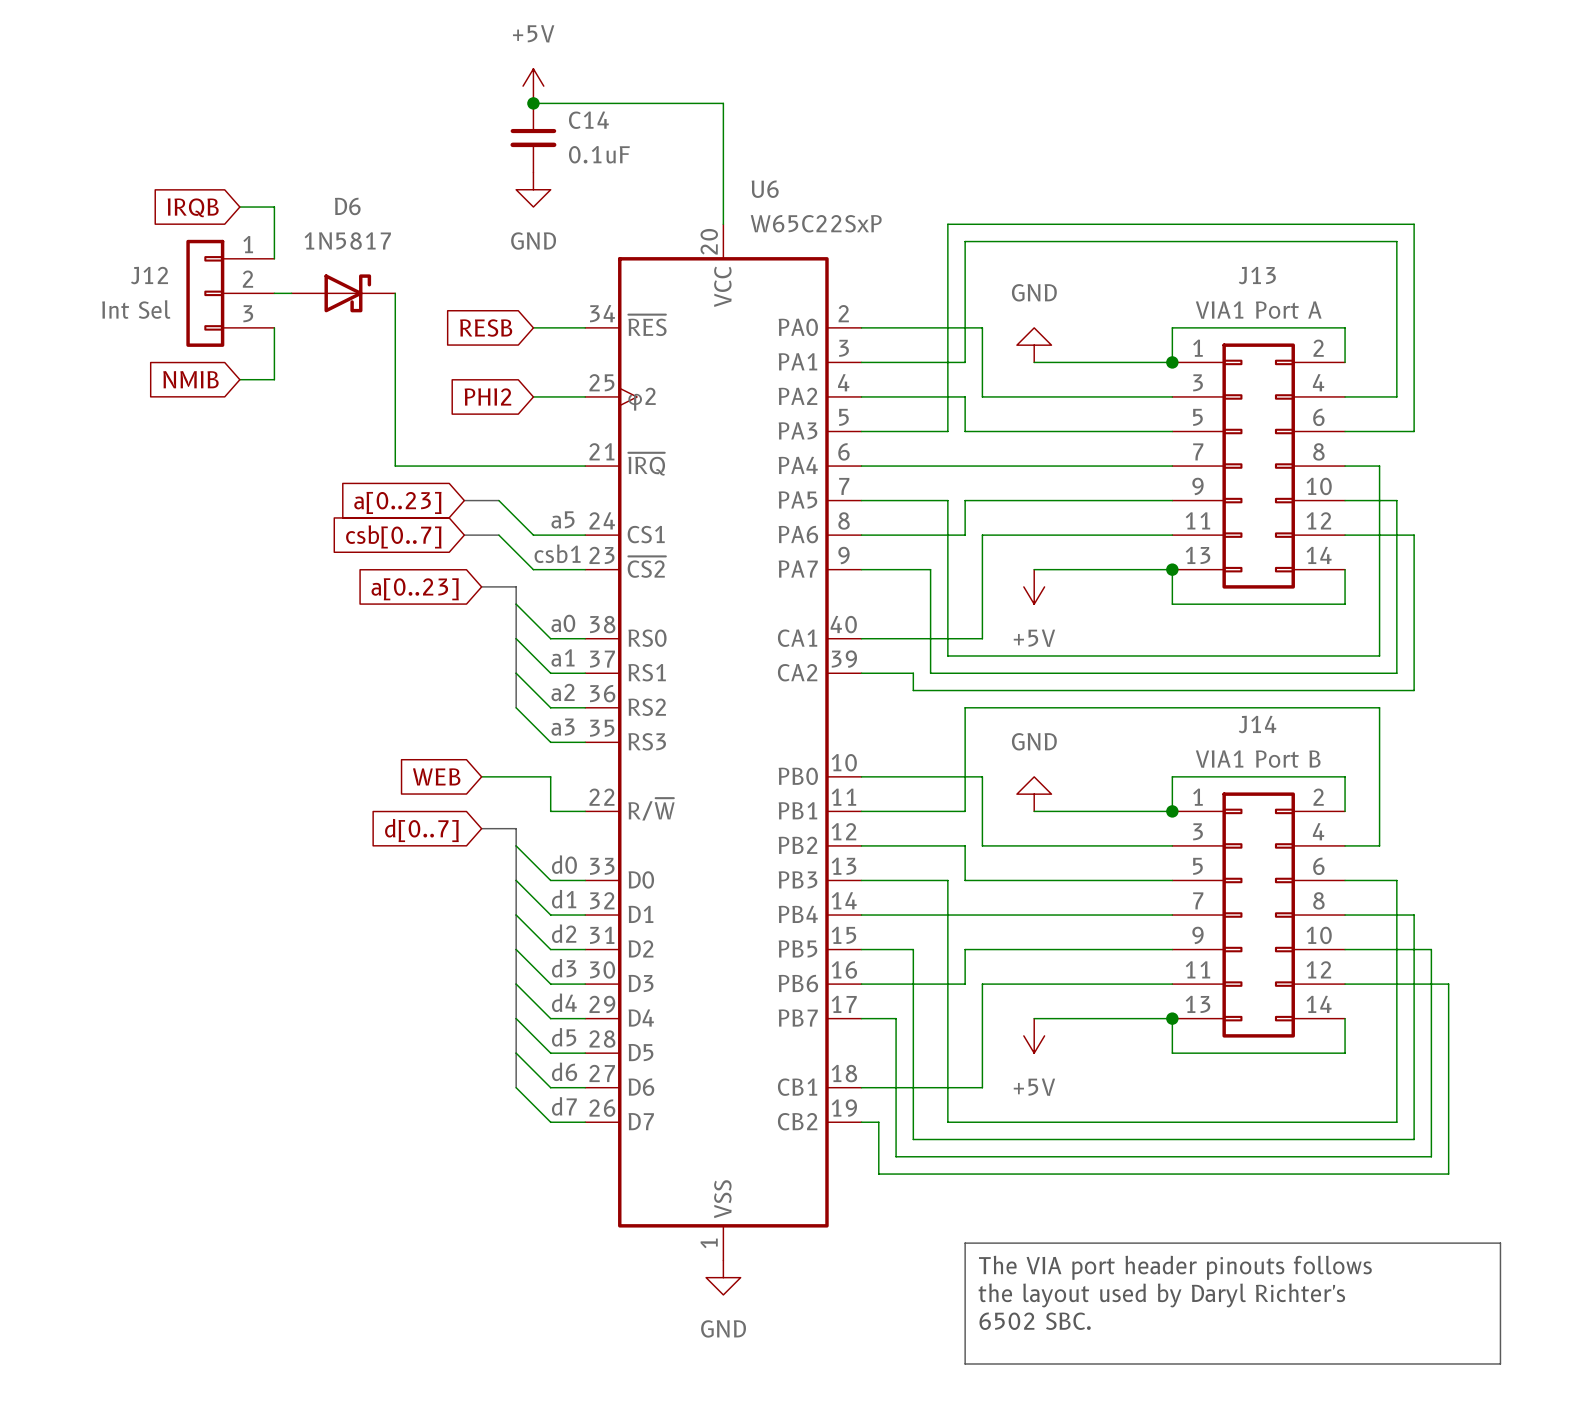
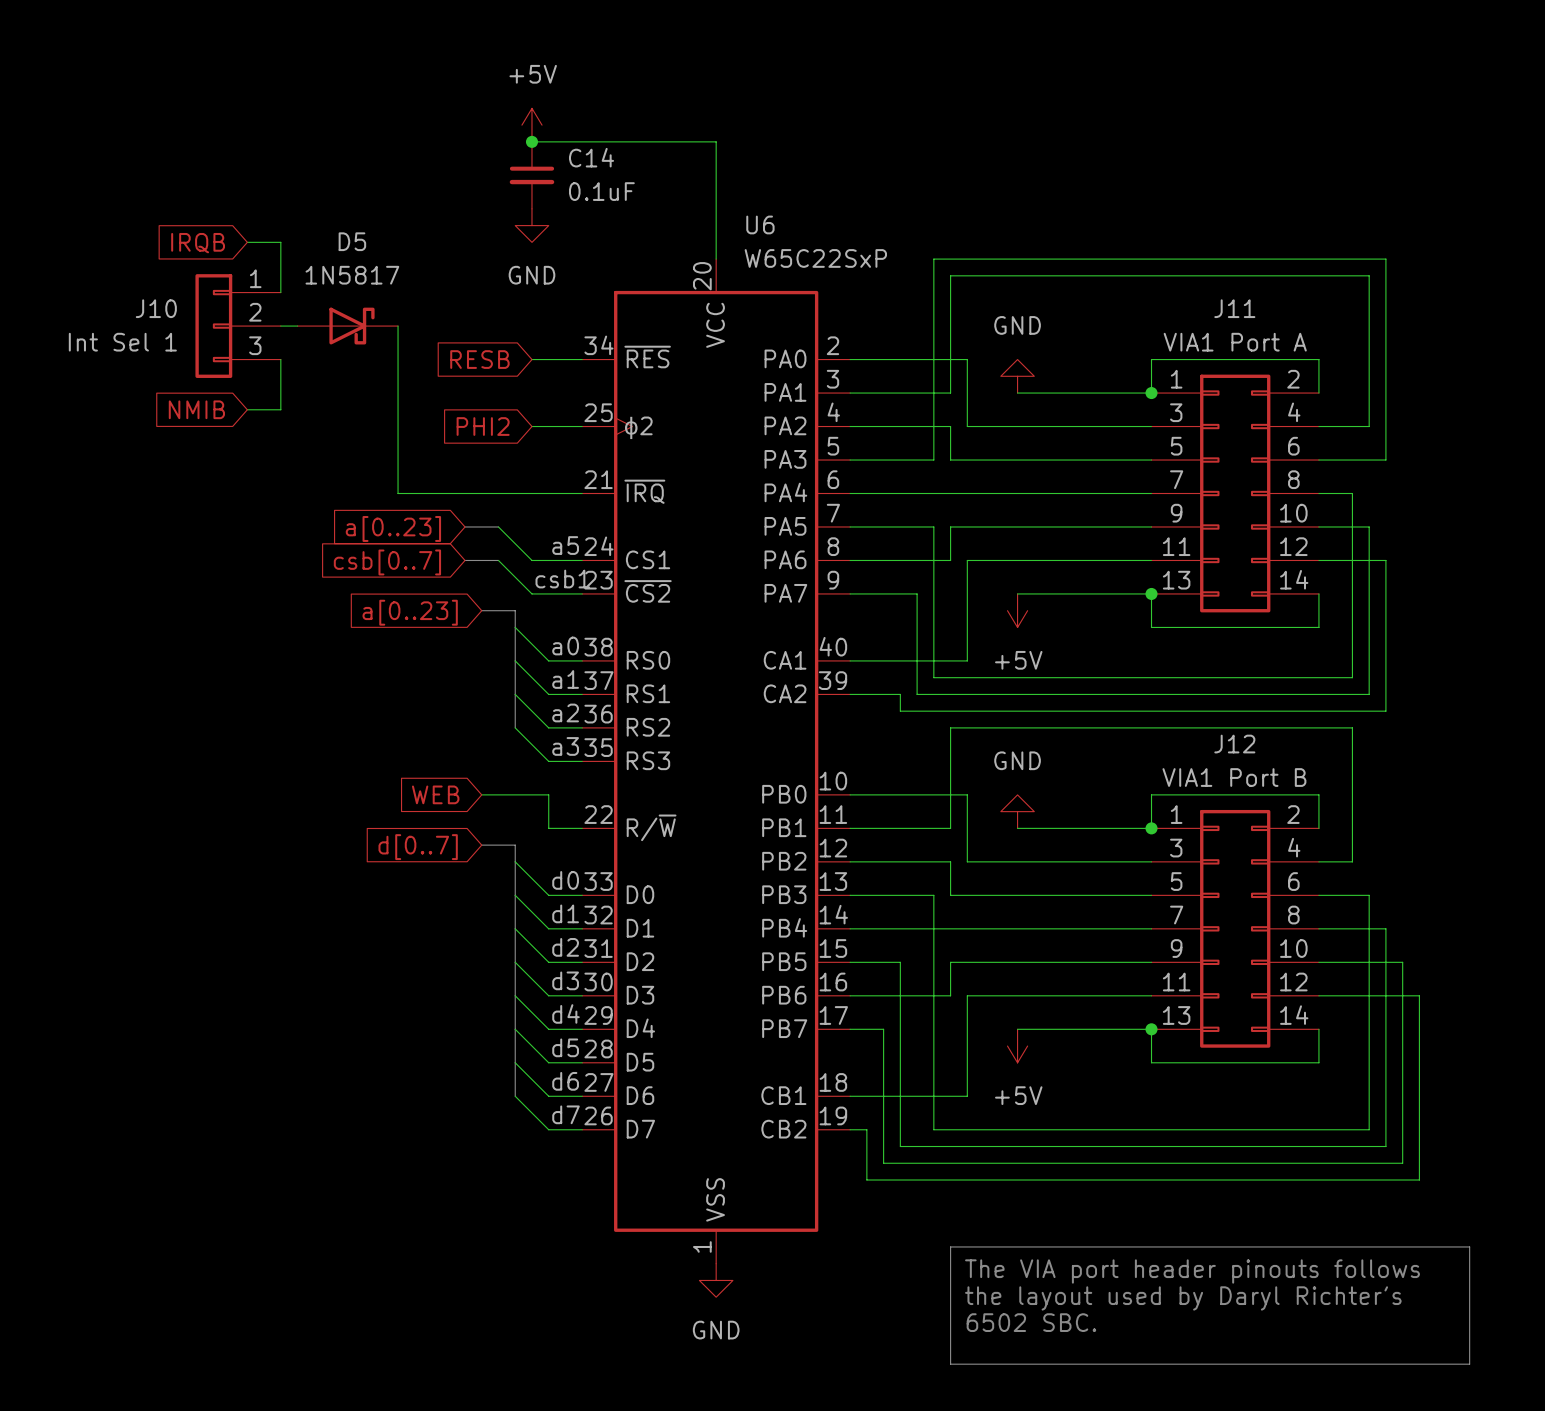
D6 name: D6 (347, 206) -> D5 (352, 241)
J12 name: J12 (149, 275) -> J10 (156, 308)
J13 name: J13 (1257, 275) -> J11 (1234, 308)
J12 value: Int Sel (136, 309) -> Int Sel 1 (122, 342)
J14 name: J14 (1257, 724) -> J12 (1234, 744)

